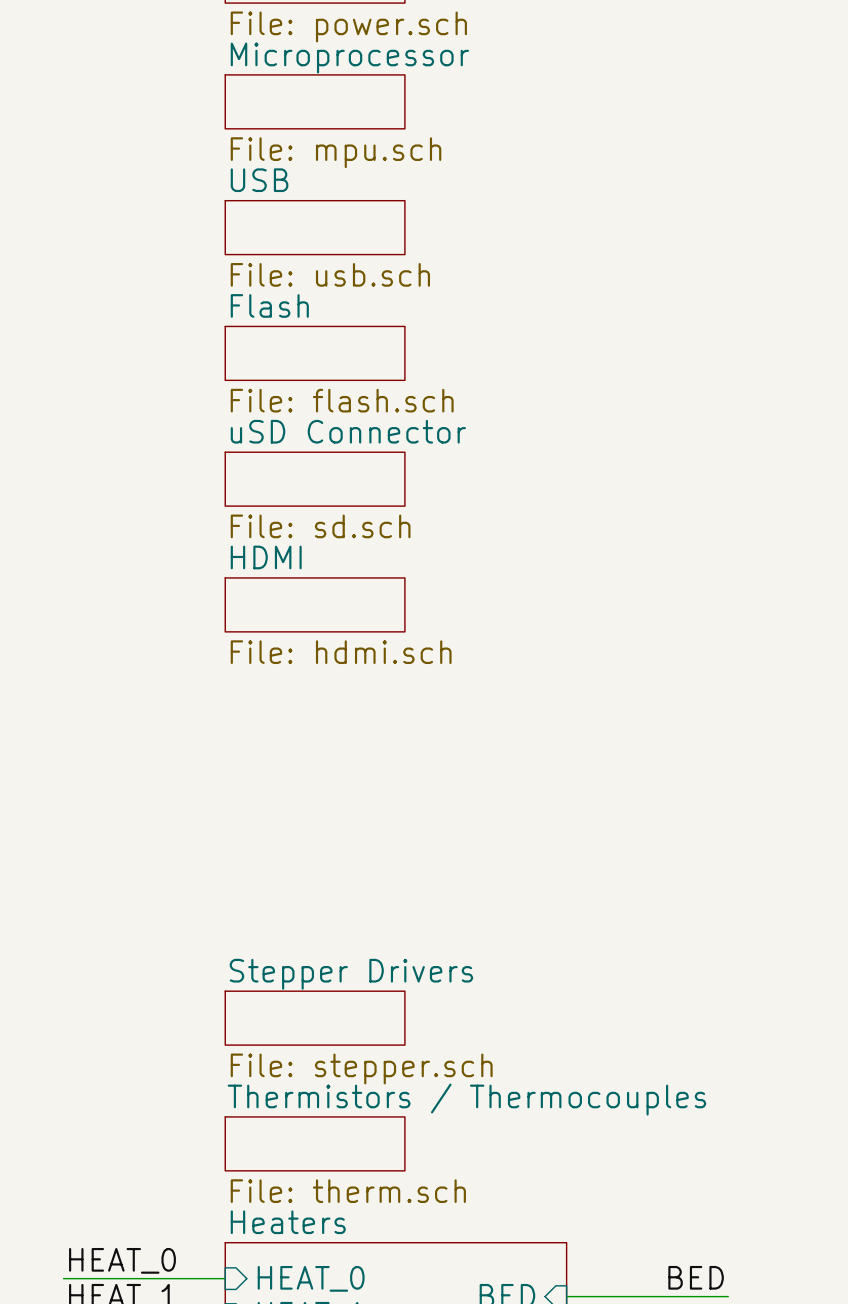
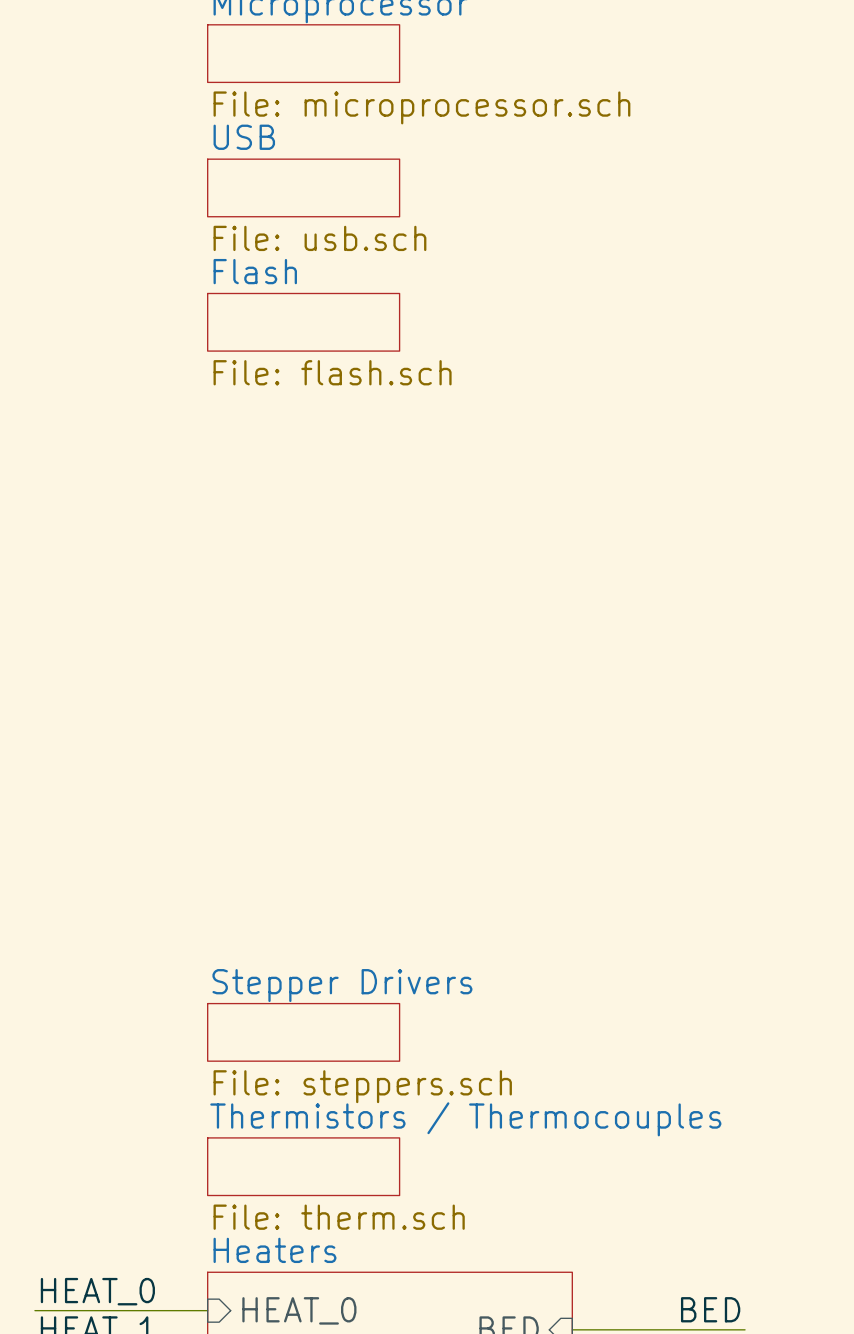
sheet Microprocessor value: File: mpu.sch (336, 152) -> File: microprocessor.sch (421, 107)
sheet uSD Connector: File: sd.sch (315, 479) -> none
sheet HDMI: File: hdmi.sch (315, 604) -> none
sheet Stepper Drivers value: File: stepper.sch (361, 1068) -> File: steppers.sch (362, 1086)

